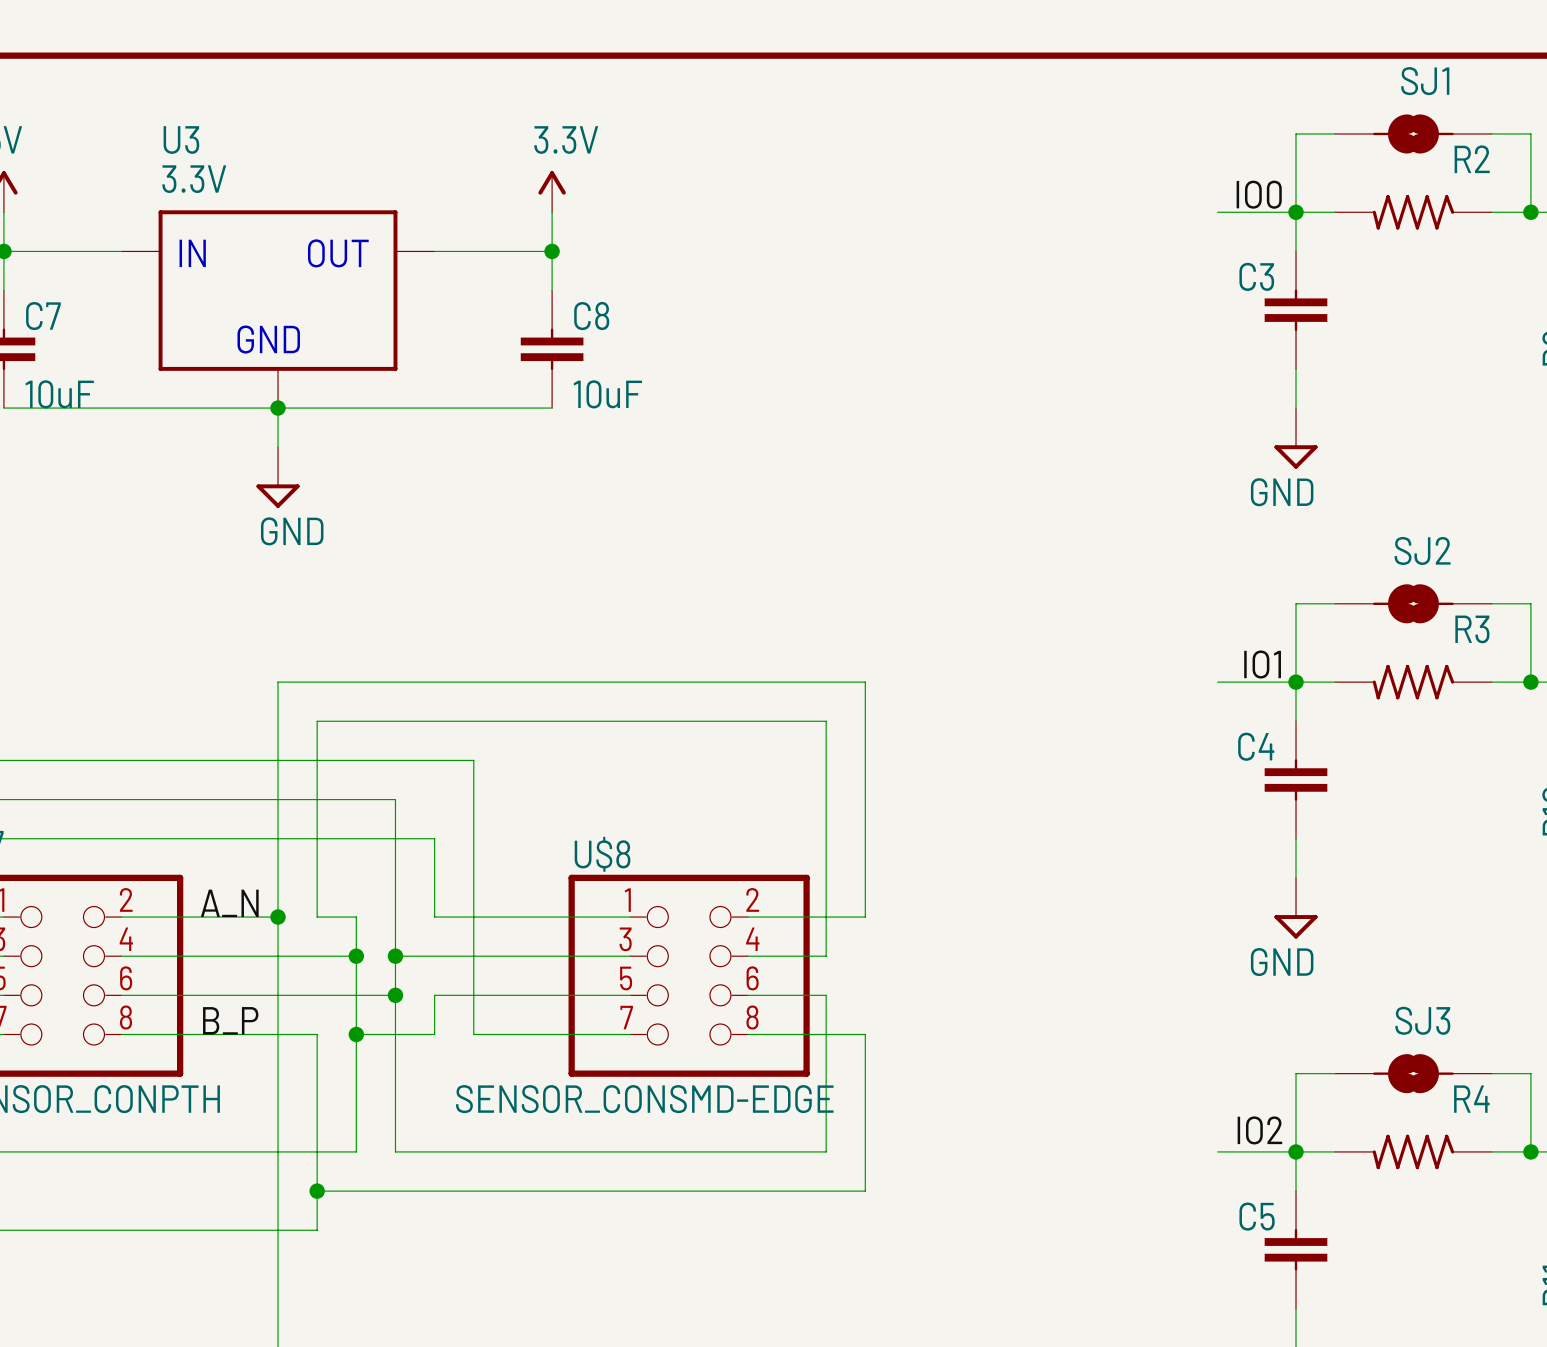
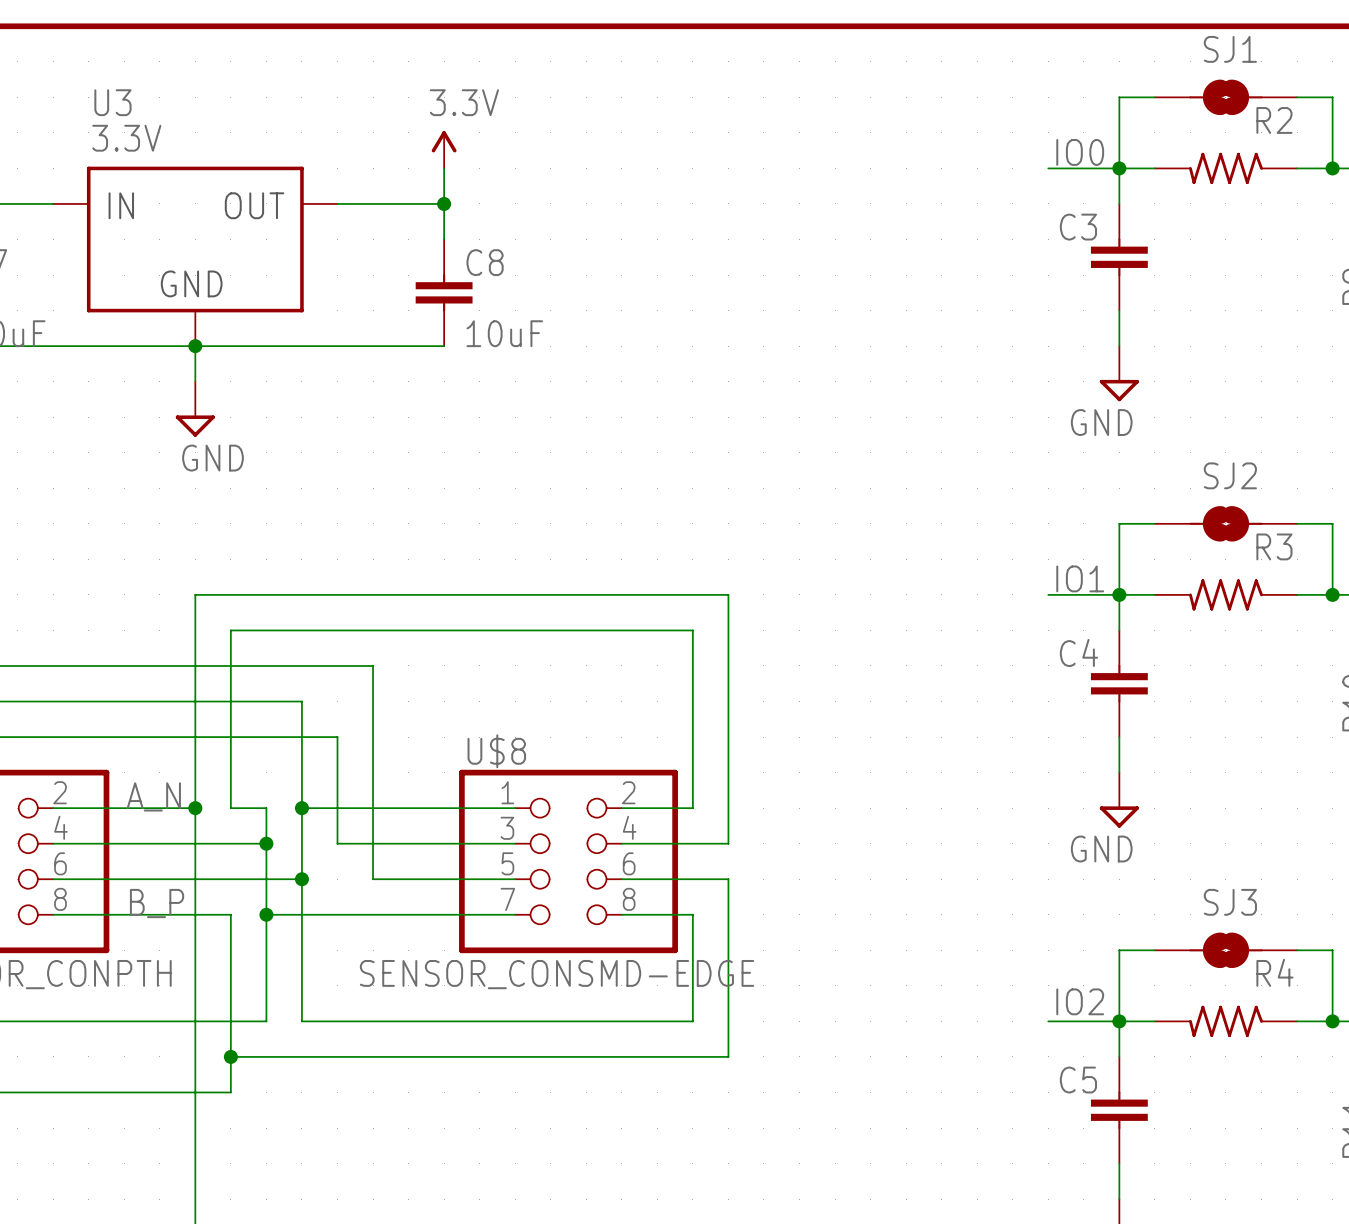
wire: (865, 917) (826, 917) (826, 956) -> (728, 808) (728, 843) (692, 843)
wire: (395, 956) (434, 956) -> (301, 808) (337, 808) (337, 843)
junction position: (395, 956) -> (301, 808)
wire: (826, 995) (826, 1034) (865, 1034) -> (692, 879) (728, 879) (728, 914)
wire: (434, 1034) (434, 995) (473, 995) (473, 1034) -> (337, 914) (373, 914)

